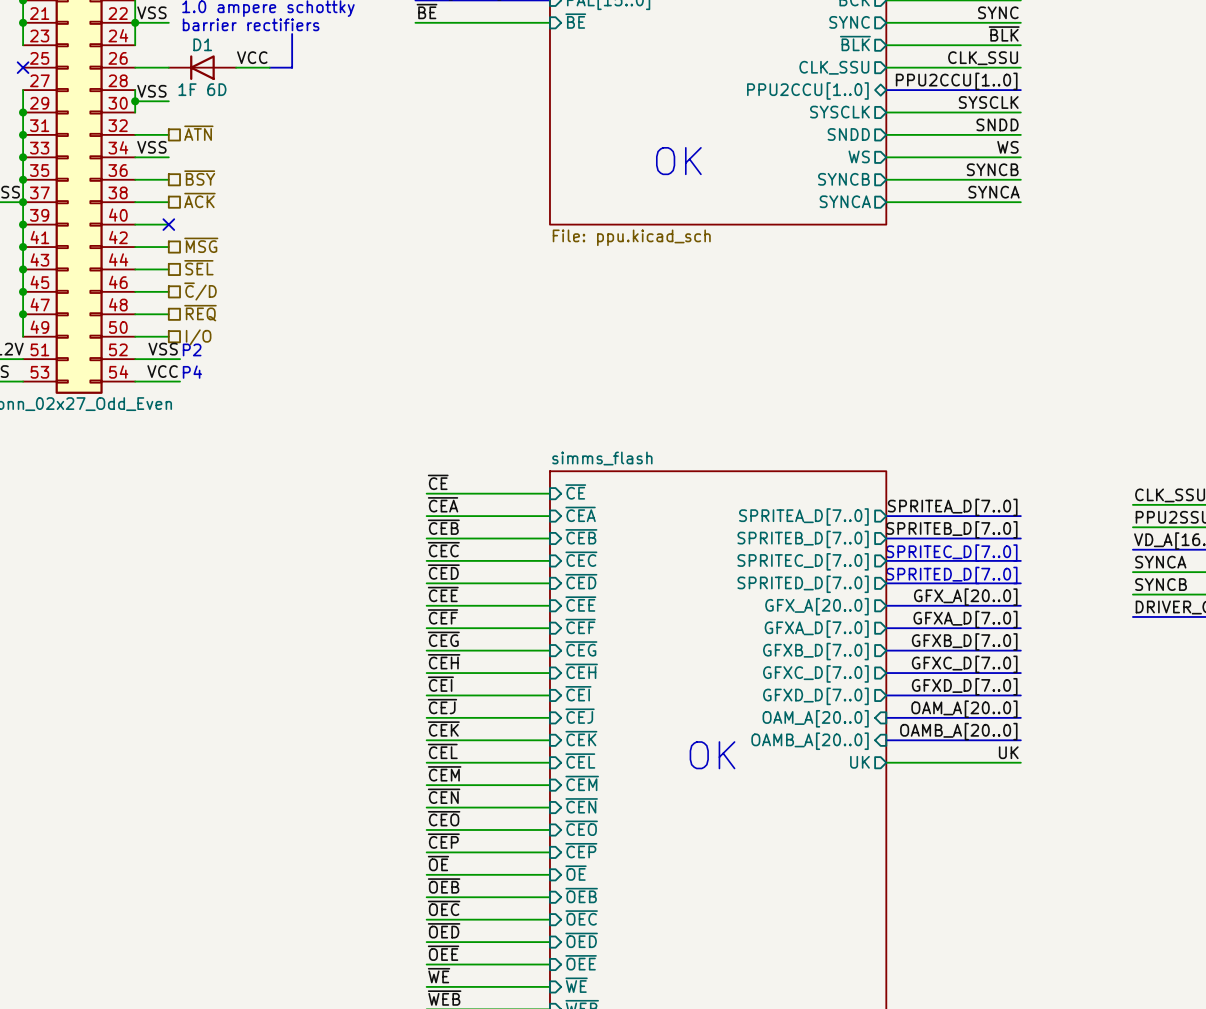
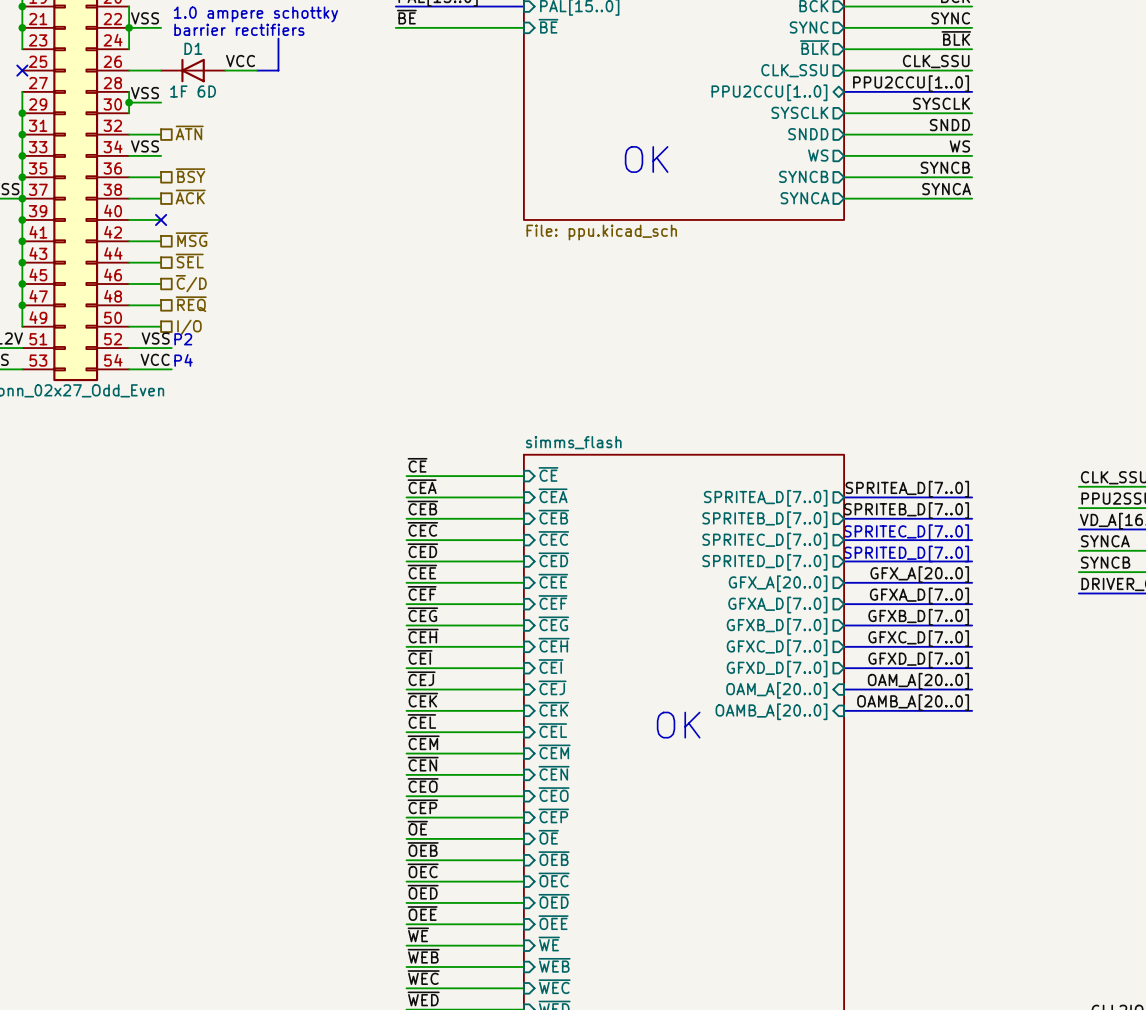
label: UK (1008, 752) -> none
sheet pin: UK (859, 762) -> none
wire: (886, 762) (1020, 762) -> none

